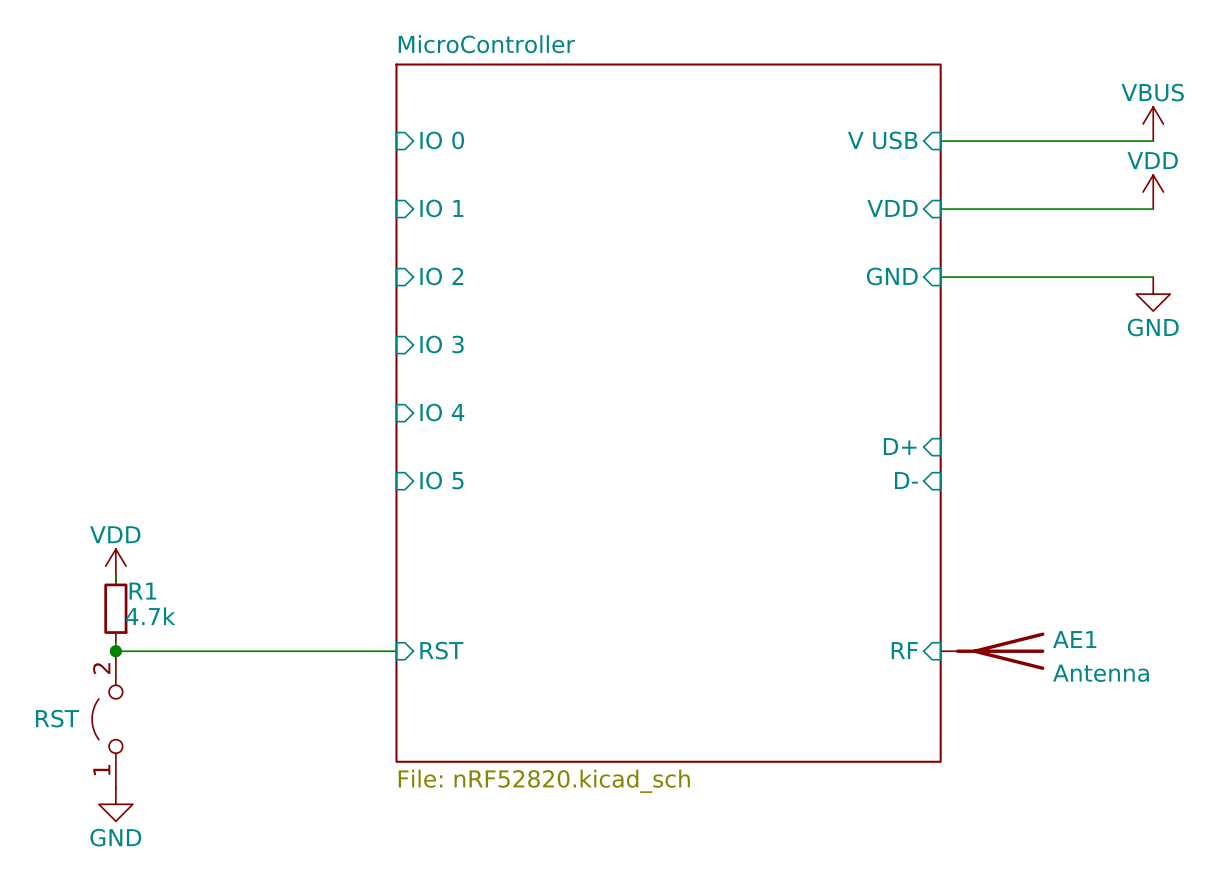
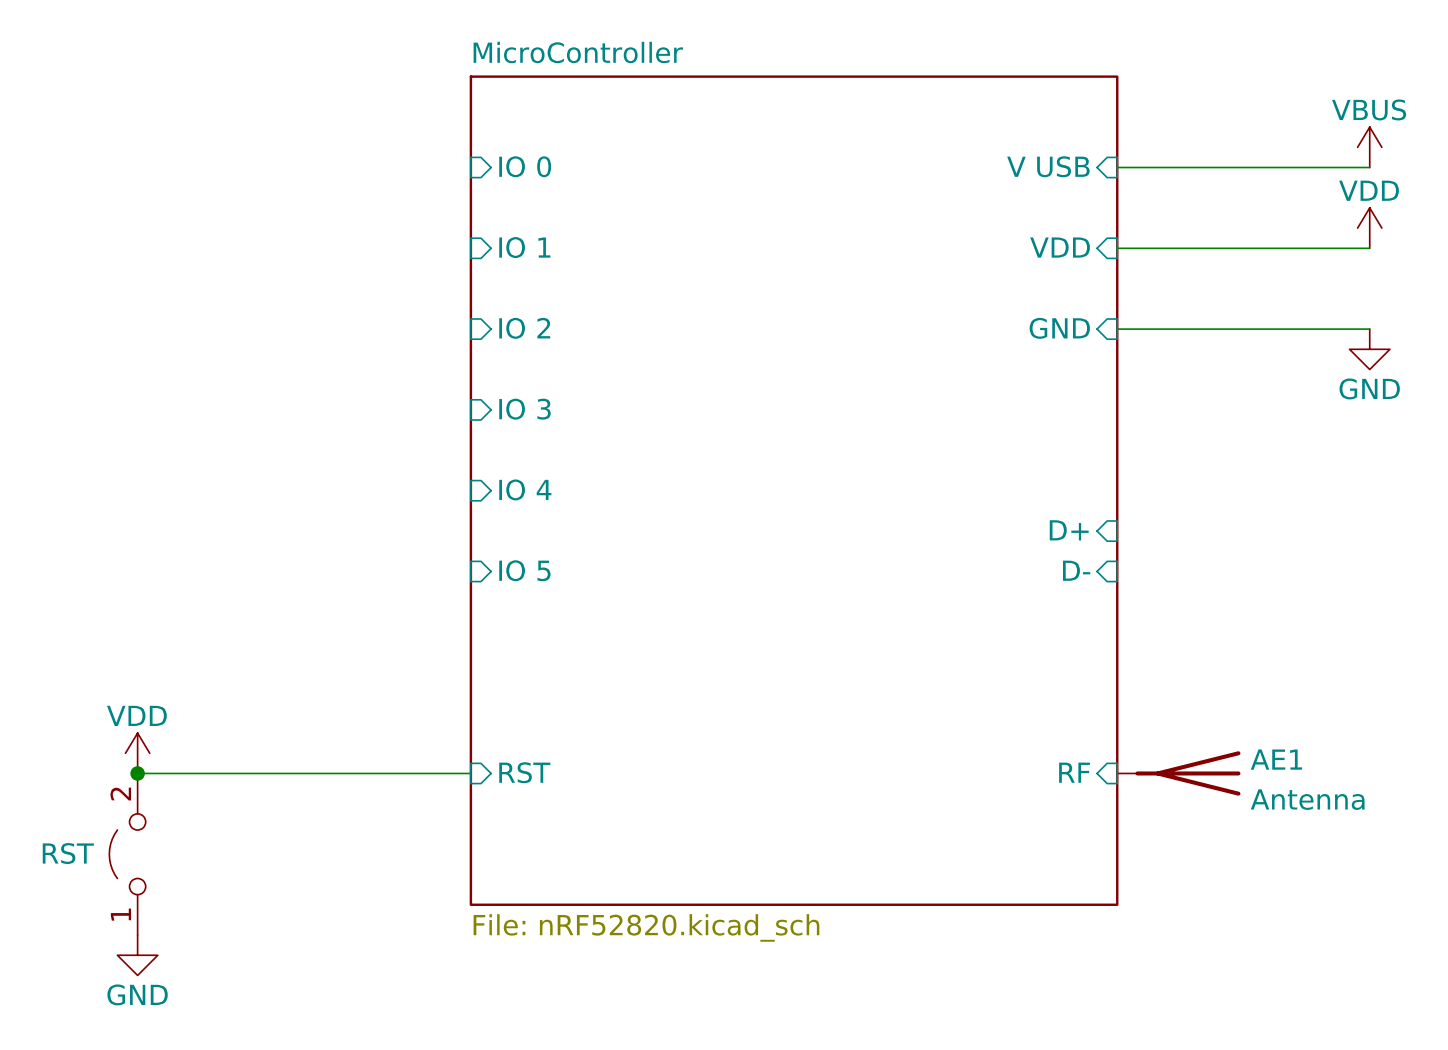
power symbol position: VDD (115, 566) -> VDD (137, 753)
wire: (115, 574) (115, 583) -> none
R1: 4.7k (115, 608) -> none

